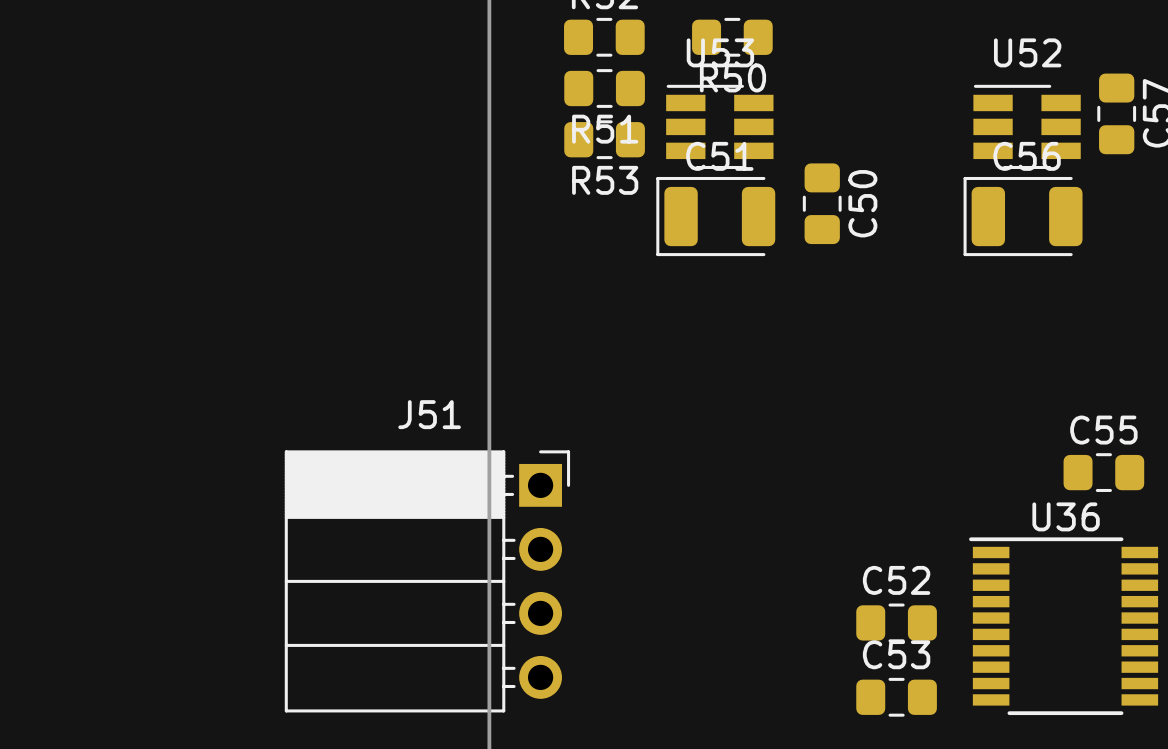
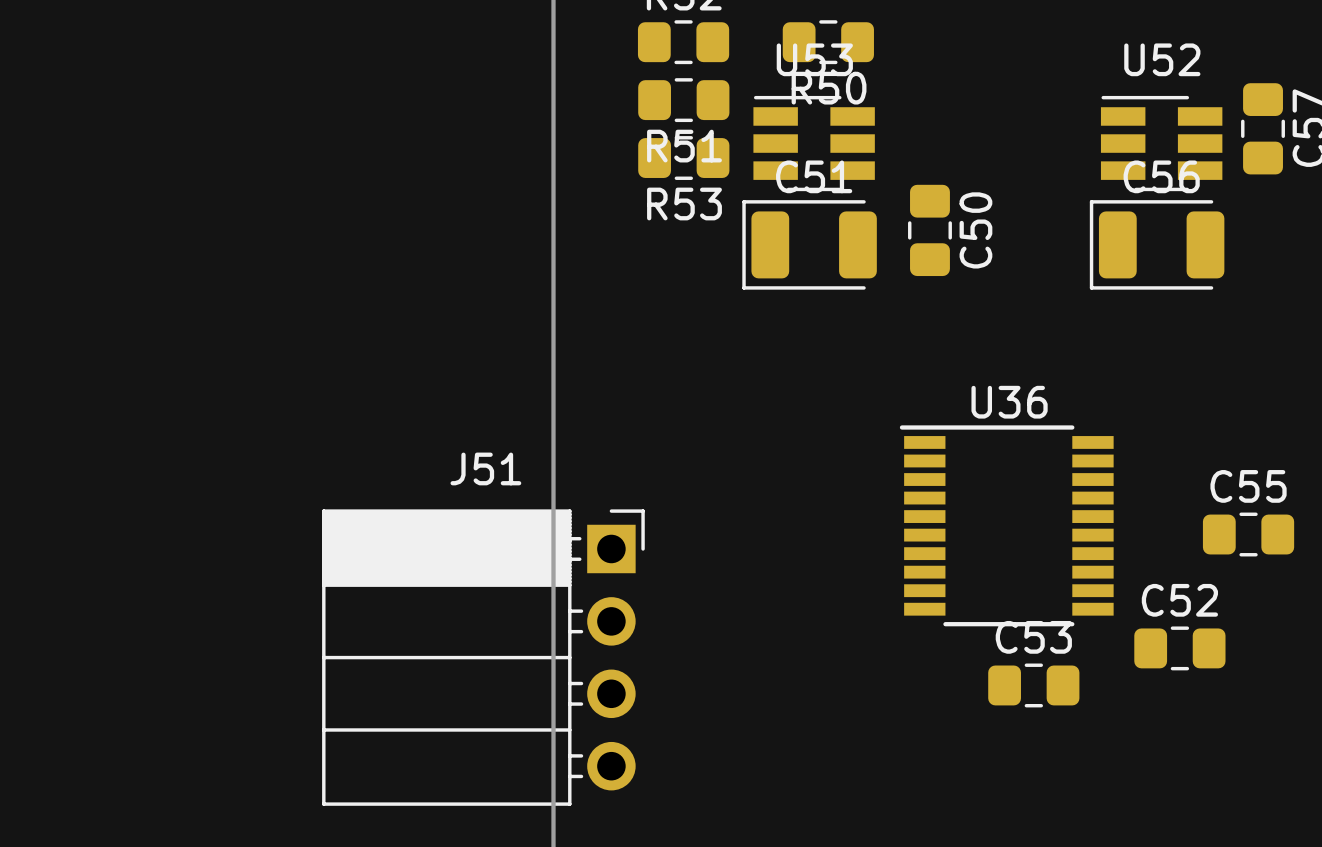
C52 position: (896, 622) -> (1179, 648)
U36 position: (1063, 626) -> (1006, 525)
C53 position: (896, 697) -> (1033, 685)

